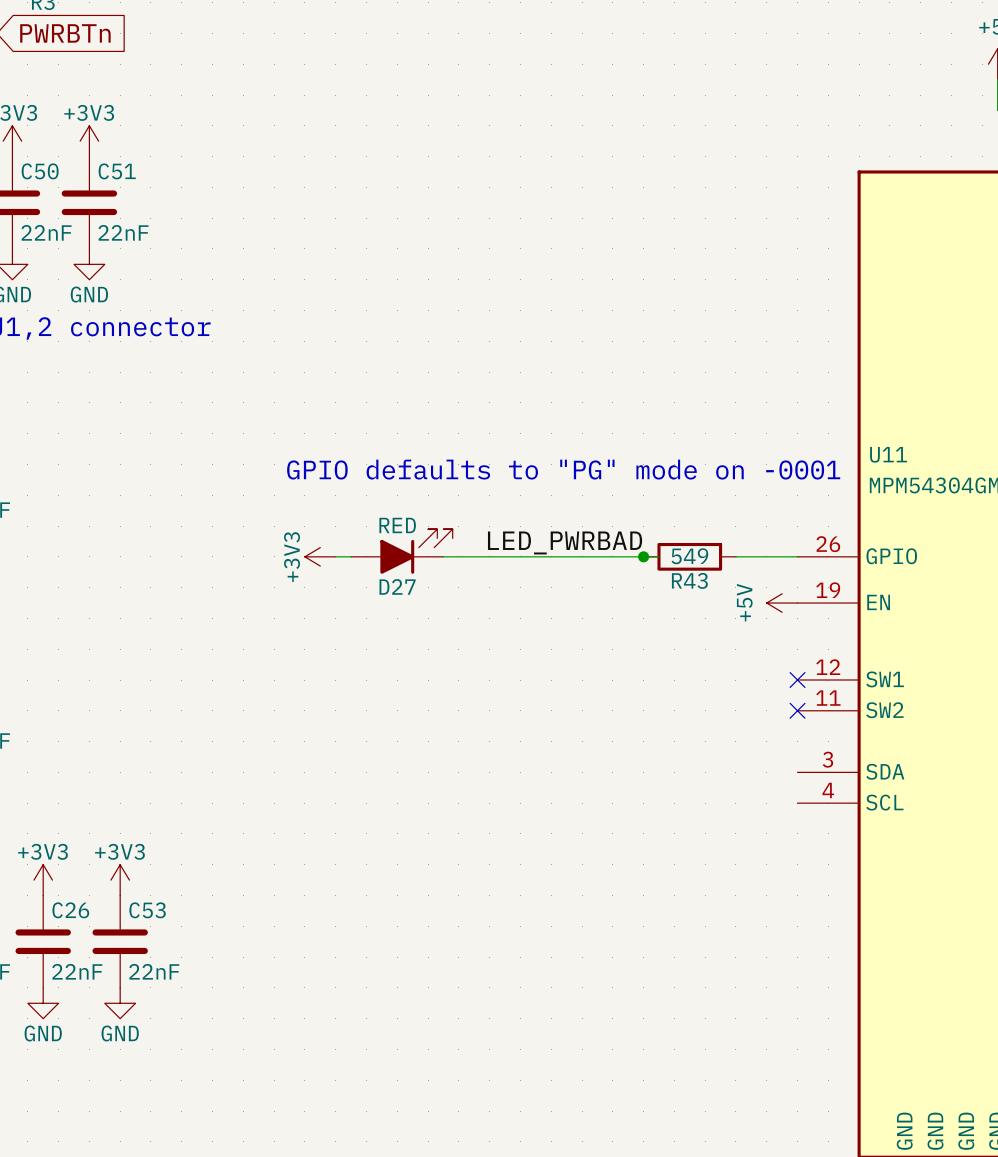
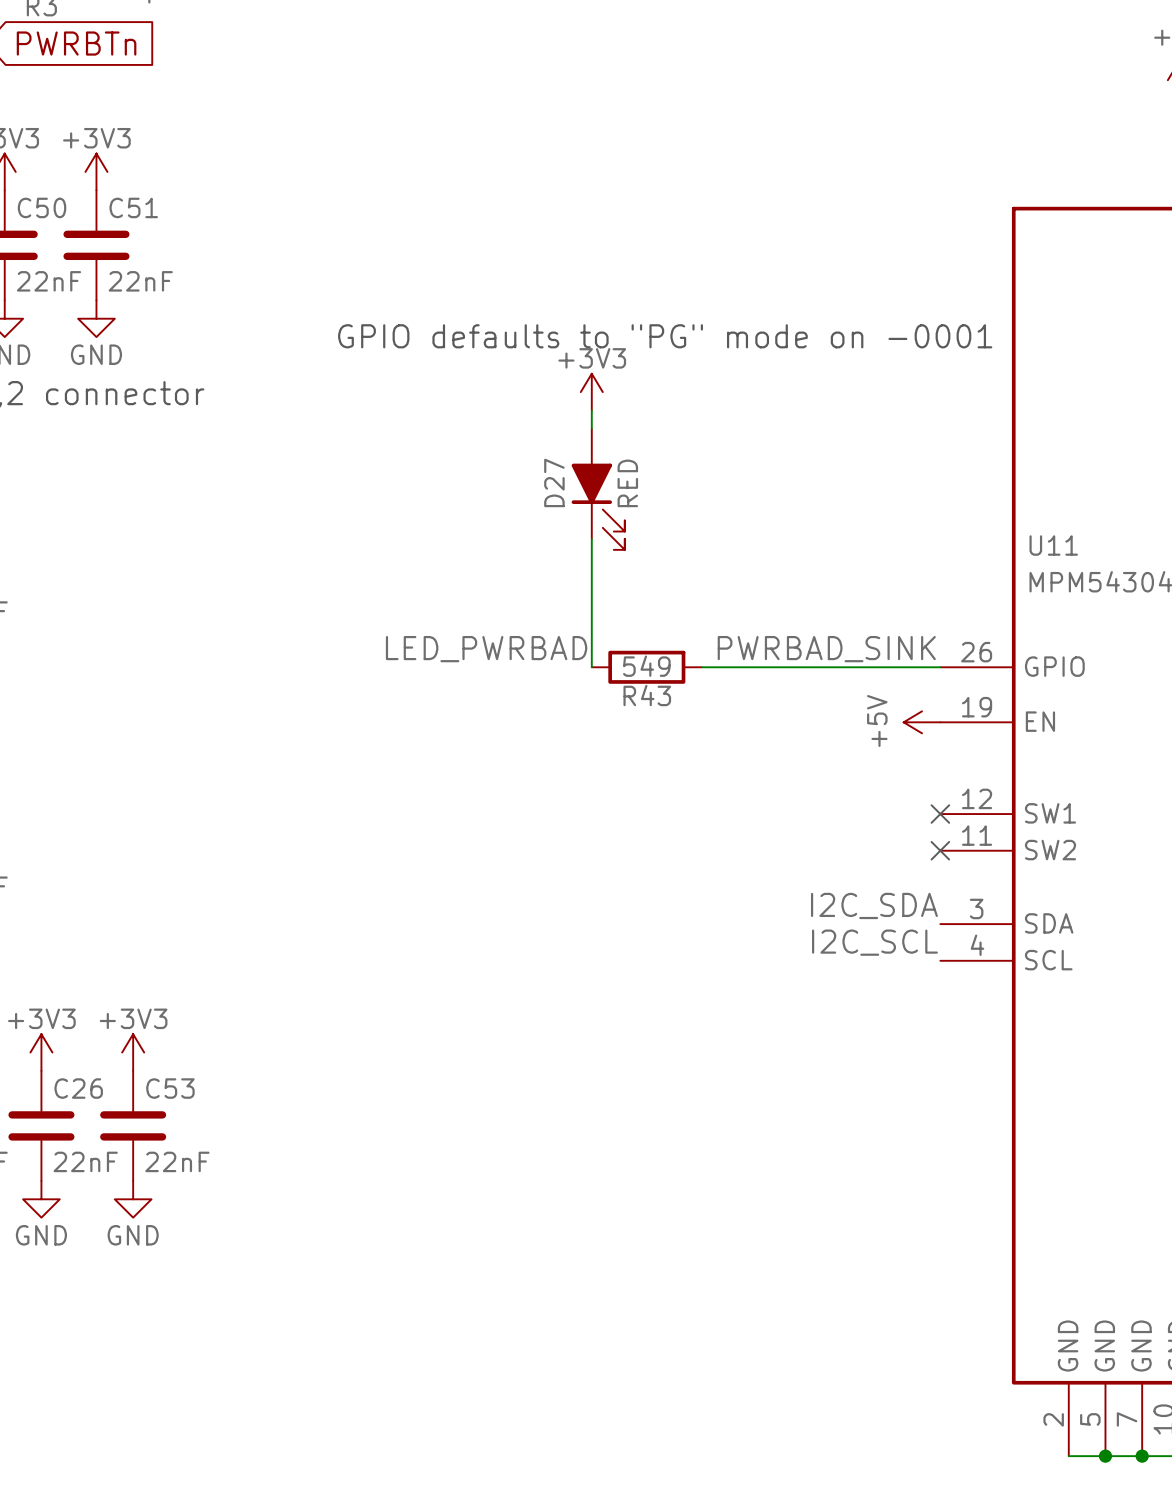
wire: none -> (591, 410) (591, 428)
wire: none -> (591, 538) (591, 667)
text position: GPIO defaults to "PG" mode on -0001 (563, 469) -> GPIO defaults to "PG" mode on -0001 (665, 336)
label position: LED_PWRBAD (565, 542) -> LED_PWRBAD (486, 649)
label: none -> PWRBAD_SINK (826, 649)
D27 position: (401, 551) -> (598, 489)
D27 rotation: 0° (416, 551) -> 90° clockwise (598, 506)
power symbol rotation: 0° (320, 556) -> 90° clockwise (591, 392)
power symbol position: +3V3 (320, 556) -> +3V3 (591, 392)
wire: (335, 556) (351, 556) -> none
wire: (443, 556) (597, 556) -> none
junction: (643, 556) -> none
wire: none -> (775, 667) (866, 667)
R43 position: (689, 556) -> (646, 667)
label: none -> I2C_SDA (874, 905)
label: none -> I2C_SCL (874, 942)

